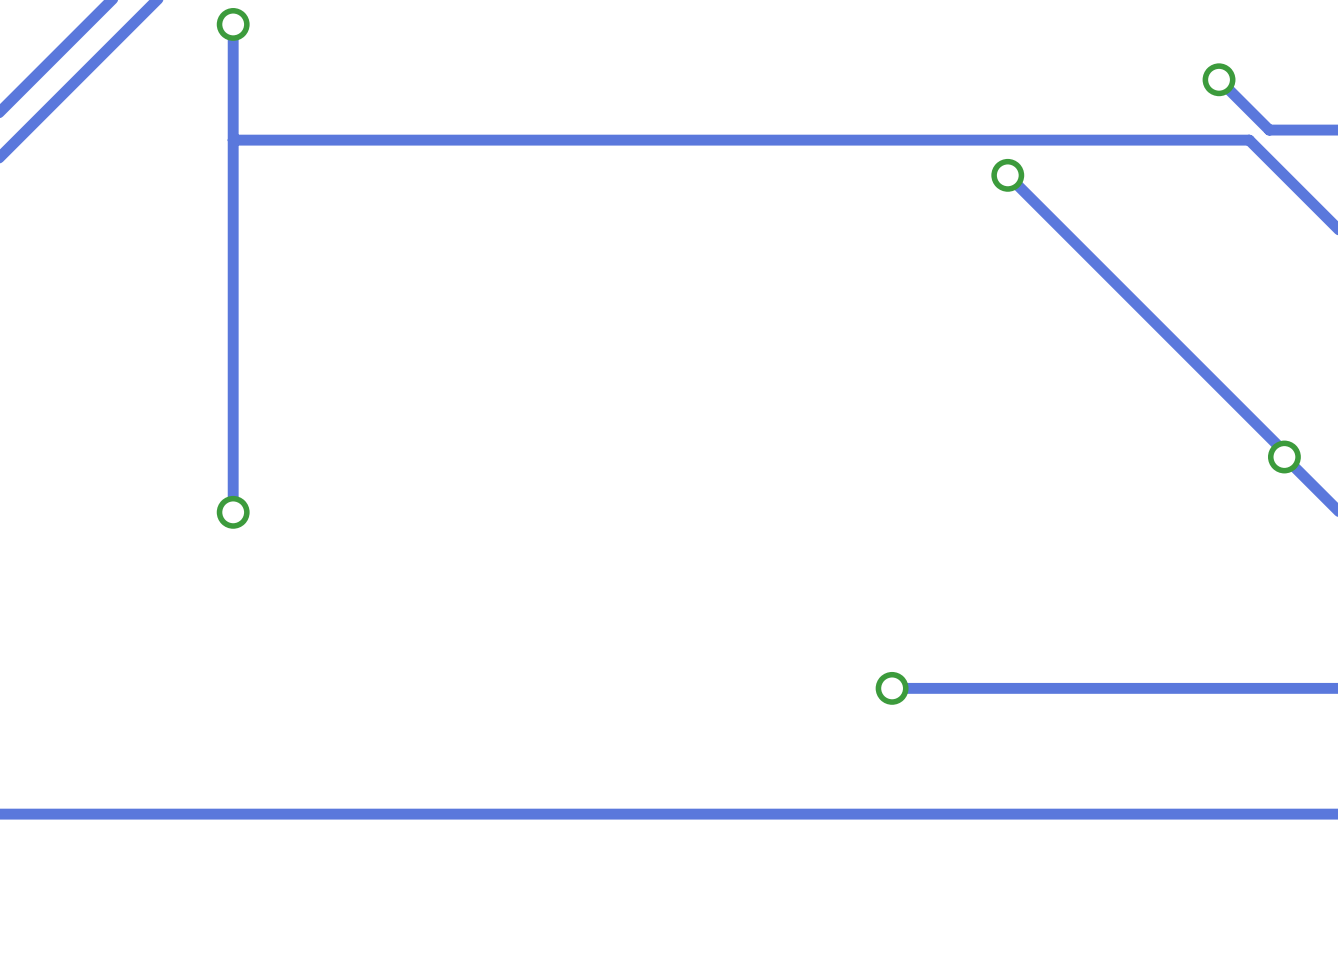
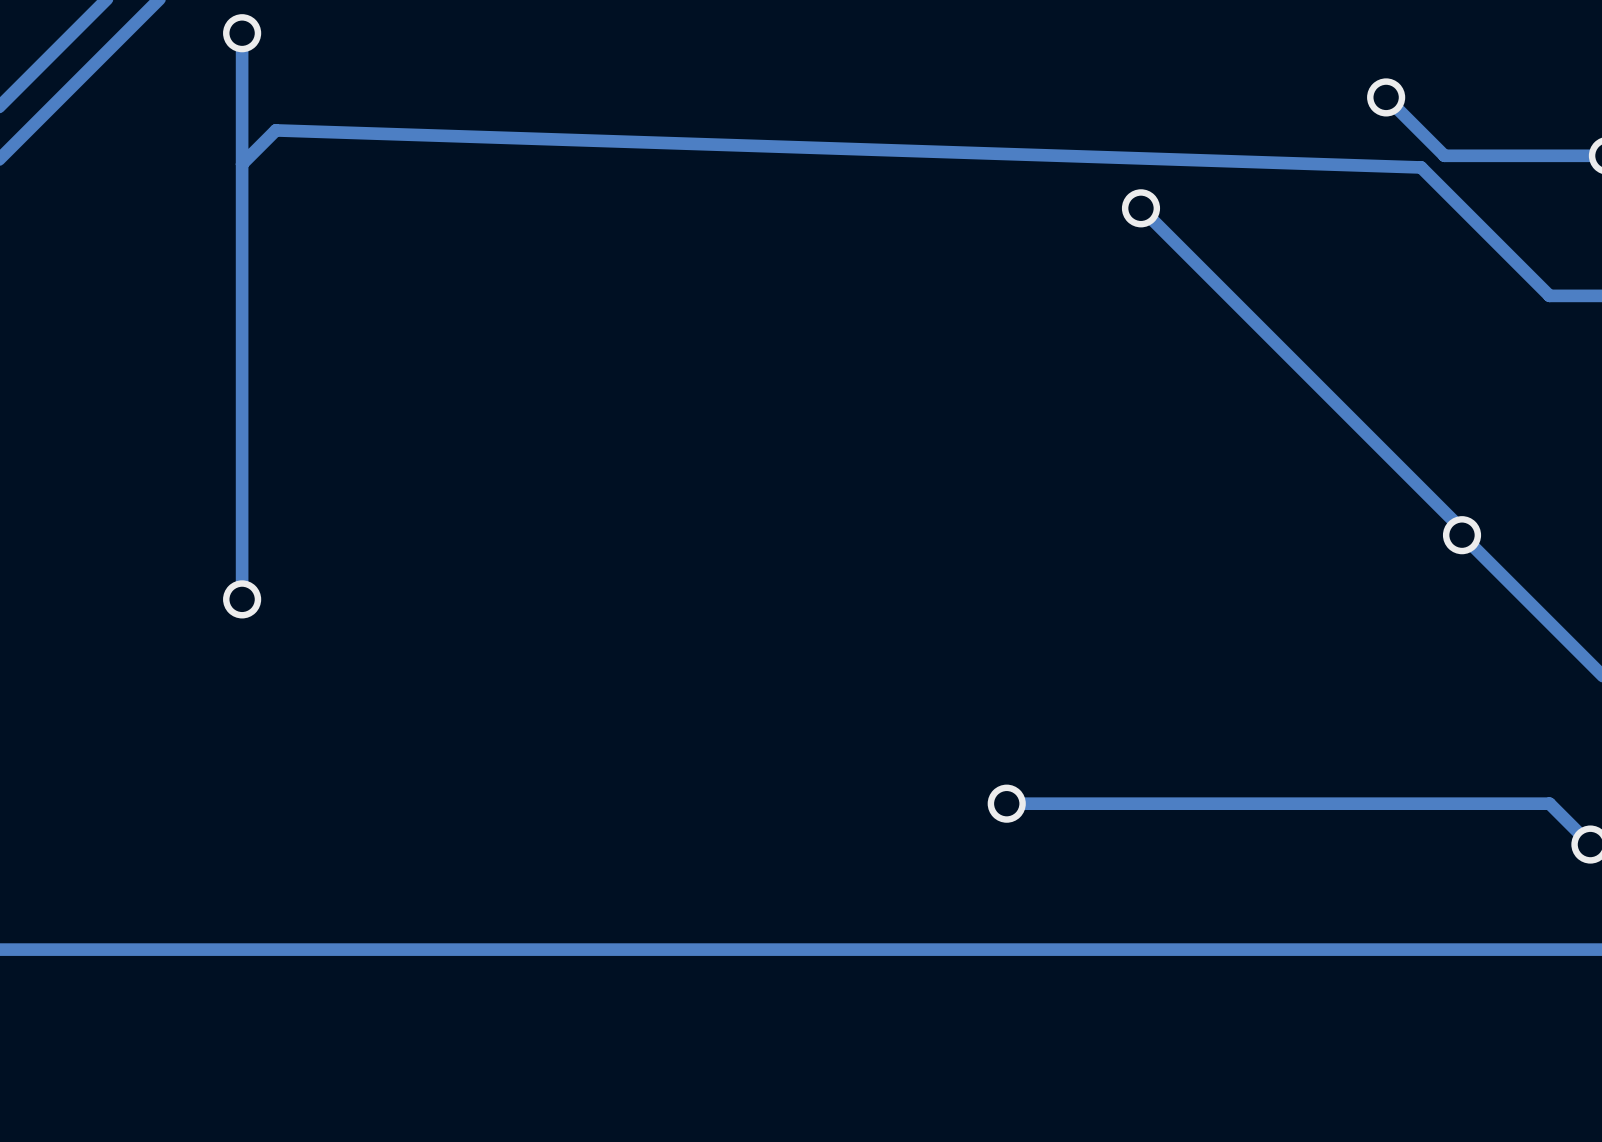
track: (1249, 140) (233, 140) -> (1421, 167) (275, 130) (242, 164)

